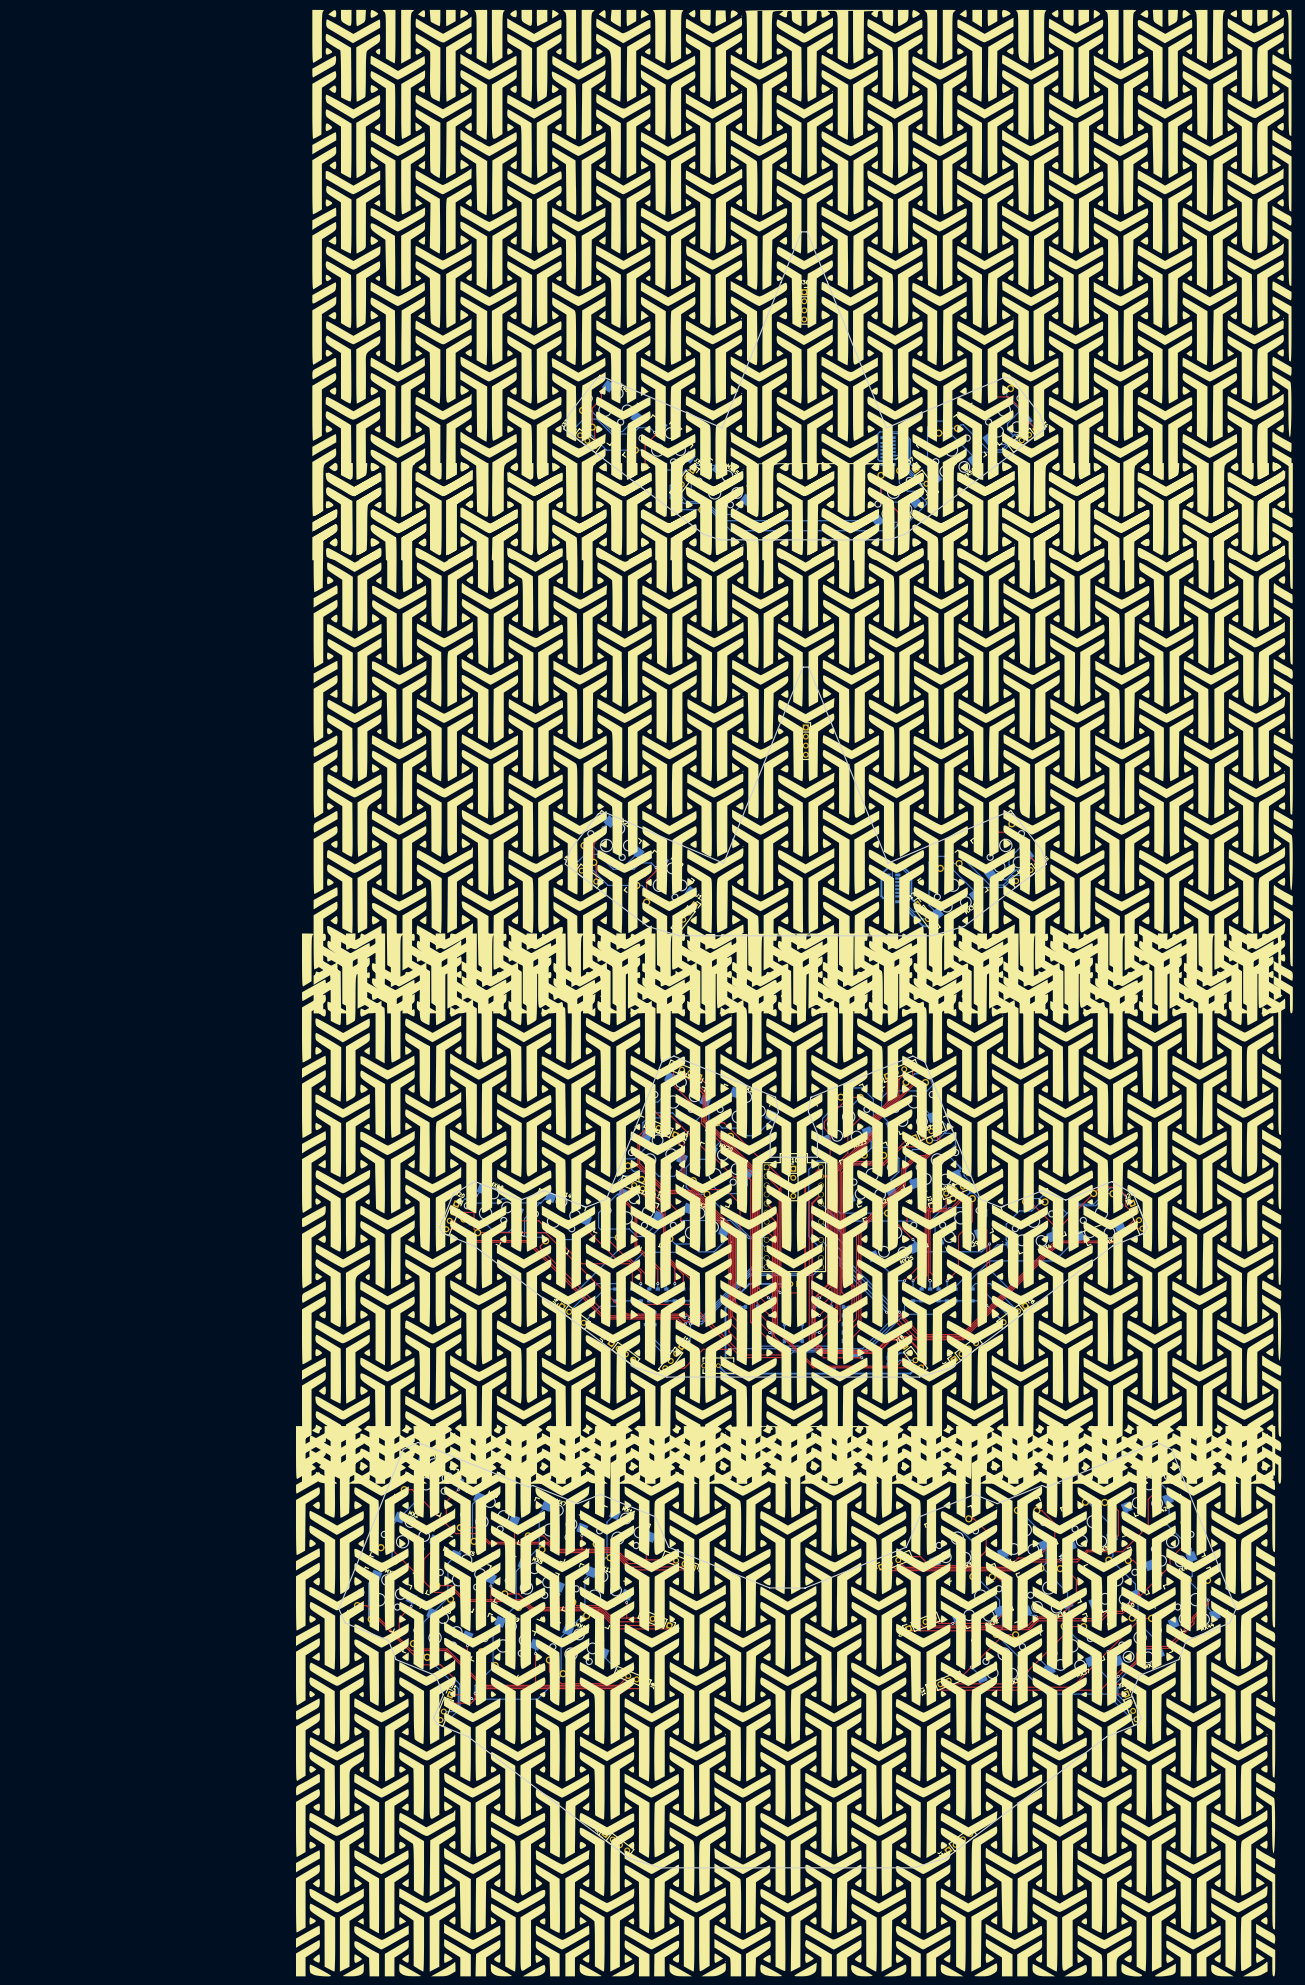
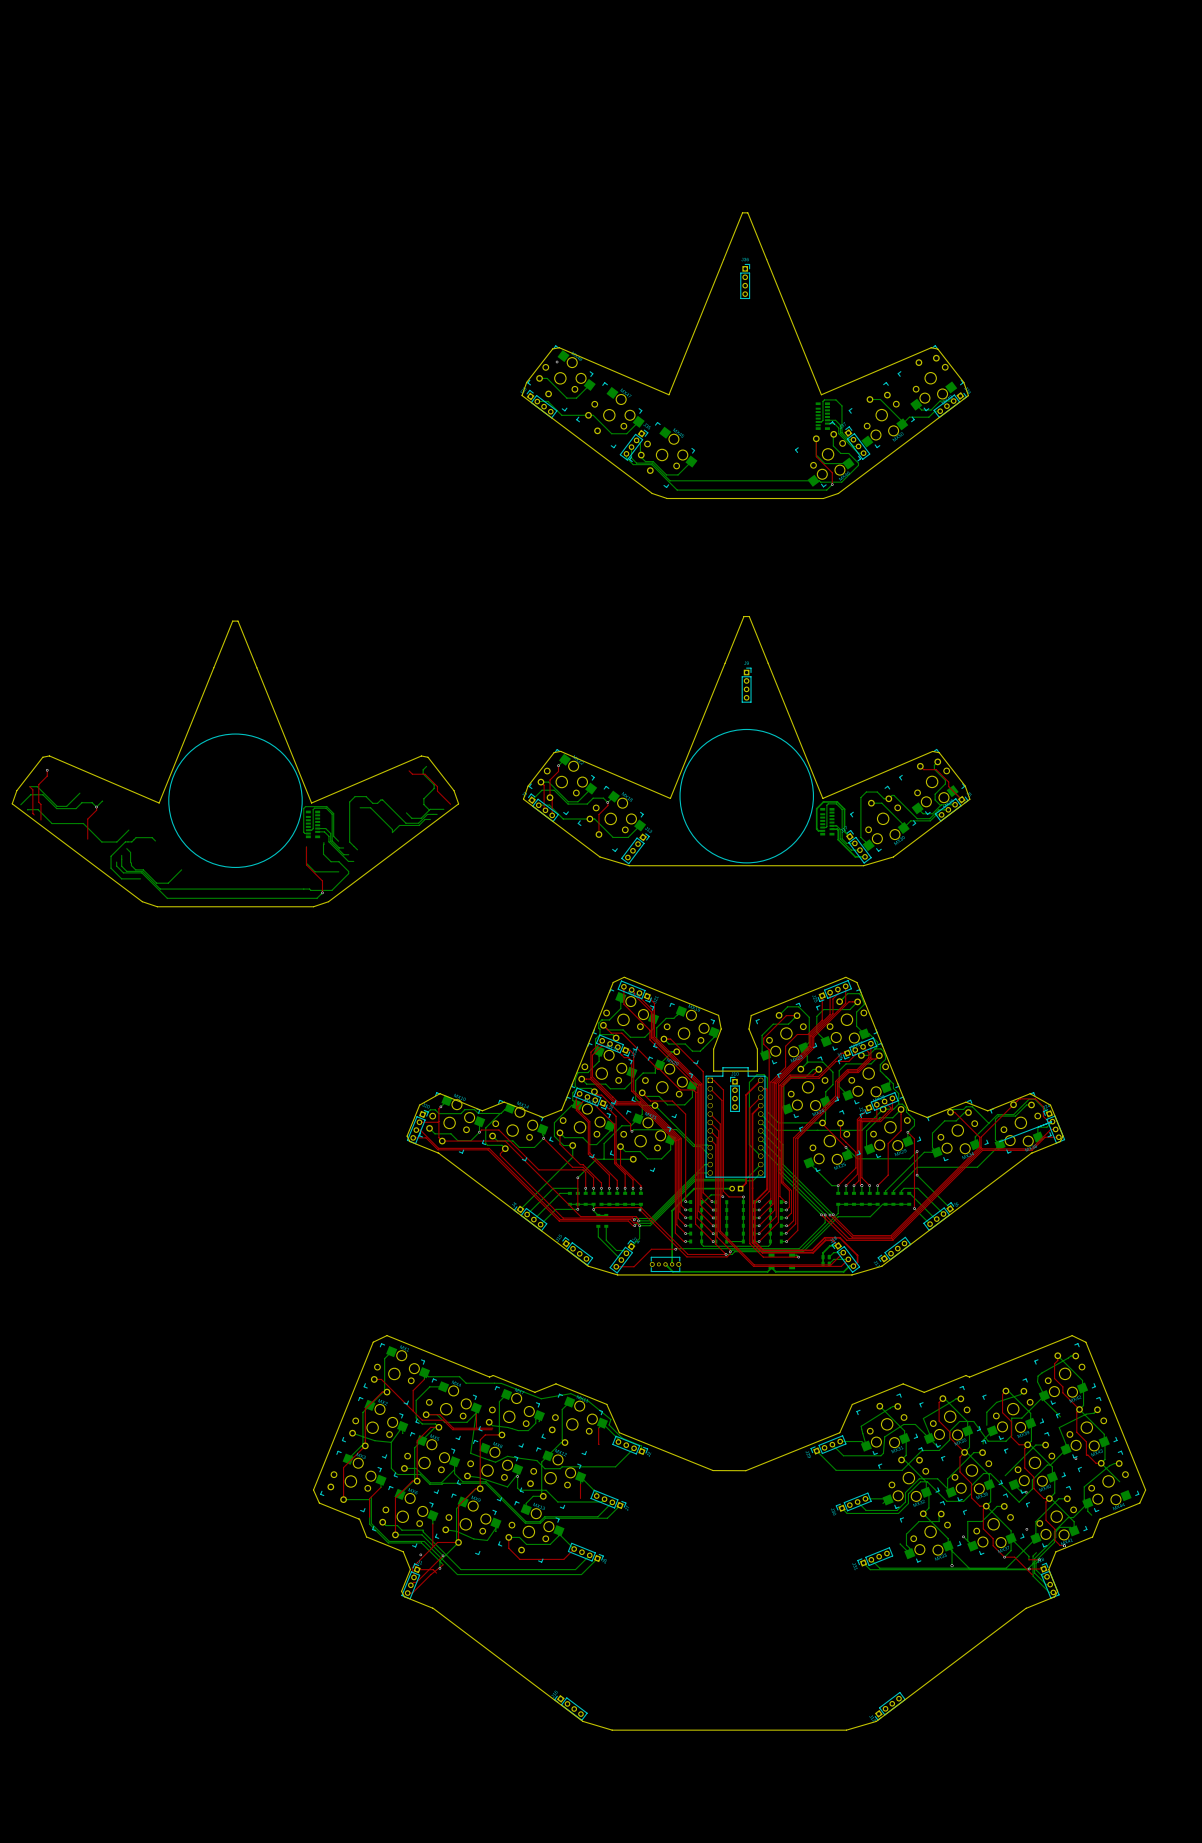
drawing: [295, 9, 1293, 1977] -> none
bottom track: (1010, 388) (1006, 392) (1006, 396) (1018, 408) (1018, 412) (1007, 423) (1007, 429) (1013, 435) -> none
top track: (601, 392) (601, 398) (592, 408) (594, 446) -> none
top track: (991, 393) (995, 396) (1008, 396) (1022, 410) (1022, 415) (1036, 429) -> none
bottom track: (661, 426) (654, 432) (649, 427) (638, 427) (632, 434) (611, 434) (596, 419) (583, 419) (572, 429) -> none
top track: (654, 432) (654, 435) (645, 445) (645, 466) -> none
via: (654, 432) -> none
bottom track: (1021, 440) (1011, 440) (1001, 449) (988, 449) (963, 424) (957, 428) (952, 428) (945, 421) (933, 421) (927, 426) (927, 469) (935, 478) -> none
bottom track: (882, 460) (877, 459) (877, 433) (879, 431) (902, 431) (910, 439) (910, 463) (915, 469) -> none
bottom track: (718, 468) (714, 465) (697, 465) (692, 469) (685, 469) (670, 485) (670, 498) (681, 509) (701, 509) -> none
board edge: none -> (232, 621) (159, 803) (49, 755) (42, 757) (16, 790) (12, 803) (142, 901) (157, 906) (313, 906) (328, 901) (458, 803) (454, 790) (428, 757) (421, 756) (311, 803) (238, 621) (232, 621)
drawing: none -> [679, 729, 814, 864]
drawing: none -> [168, 733, 303, 868]
bottom track: none -> (426, 766) (423, 769) (423, 773) (434, 784) (434, 788) (423, 798) (423, 804) (429, 810)
top track: none -> (47, 770) (47, 776) (38, 784) (40, 819)
via: none -> (47, 770)
top track: none -> (409, 770) (412, 774) (425, 774) (450, 804)
top track: none -> (29, 786) (32, 789) (34, 814)
bottom track: none -> (29, 786) (37, 786) (57, 806) (66, 806) (79, 793)
bottom track: none -> (102, 801) (96, 807) (92, 802) (81, 802) (76, 808) (56, 808) (42, 794) (30, 794) (20, 804)
top track: none -> (96, 807) (96, 810) (87, 819) (87, 839)
via: none -> (96, 807)
bottom track: none -> (360, 807) (370, 807) (392, 829) (392, 832) (399, 825) (419, 825) (425, 819) (430, 819)
bottom track: none -> (443, 809) (430, 809) (421, 818) (411, 818) (406, 812)
bottom track: none -> (27, 809) (38, 809) (52, 823) (83, 823) (101, 842) (116, 842) (128, 830)
bottom track: none -> (437, 814) (427, 814) (418, 823) (405, 823) (382, 799) (377, 803) (372, 803) (366, 796) (355, 796) (349, 802) (349, 841) (357, 849)
part: none -> (313, 824)
bottom track: none -> (317, 828) (325, 828) (330, 833) (330, 841) (343, 854)
bottom track: none -> (308, 830) (313, 828) (313, 809) (326, 808) (332, 814) (332, 840) (339, 847) (343, 847)
bottom track: none -> (317, 831) (324, 831) (328, 836) (328, 841) (348, 861) (353, 861)
bottom track: none -> (308, 833) (303, 832) (303, 808) (305, 806) (326, 806) (333, 813) (333, 836) (338, 841)
bottom track: none -> (155, 840) (152, 837) (136, 837) (131, 841) (125, 841) (111, 856) (111, 868) (121, 878) (140, 878)
bottom track: none -> (323, 842) (323, 854) (331, 861) (338, 861) (348, 871) (331, 890) (160, 889) (142, 871) (126, 871) (121, 866) (121, 855)
top track: none -> (306, 847) (306, 865) (322, 881) (322, 892)
bottom track: none -> (306, 847) (306, 863) (314, 871) (338, 871)
bottom track: none -> (126, 848) (130, 852) (131, 865) (135, 869) (143, 869) (156, 883) (168, 883) (181, 869)
bottom track: none -> (343, 854) (348, 854)
bottom track: none -> (116, 862) (116, 866) (123, 872) (141, 872) (167, 898) (316, 898) (322, 892)
via: none -> (322, 892)
top track: none -> (1057, 1355) (1057, 1360) (1054, 1363) (1054, 1378) (1062, 1386) (1062, 1392) (1079, 1409) (1076, 1412) (1076, 1432) (1086, 1441) (1086, 1455) (1096, 1463) (1101, 1463)
top track: (1160, 1464) (1160, 1486) (1148, 1499) (1148, 1526) (1122, 1551) (1087, 1551) (1077, 1561) (1023, 1561) (1014, 1570) (885, 1570) (881, 1566) -> none
bottom track: none -> (1075, 1355) (1071, 1355) (1038, 1376) (1037, 1381) (1044, 1395) (1021, 1418) (1011, 1418) (1011, 1435) (1006, 1441) (988, 1441) (973, 1421) (959, 1421) (949, 1431) (949, 1439) (939, 1450) (921, 1450) (902, 1470) (836, 1470) (816, 1450)
bottom track: none -> (424, 1372) (428, 1376) (459, 1376) (466, 1383) (501, 1383) (541, 1398) (570, 1393) (588, 1401) (610, 1419) (609, 1424) (622, 1438) (641, 1446) (641, 1451)
via: (458, 1489) -> none
bottom track: (479, 1497) (472, 1504) (472, 1539) -> (443, 1386) (429, 1386) (416, 1400) (416, 1418) (422, 1423) (435, 1423) (437, 1425)
top track: none -> (1005, 1391) (1002, 1394) (1002, 1412) (1011, 1421) (1011, 1437) (1019, 1444) (1027, 1444) (1024, 1448) (1024, 1468) (1033, 1477) (1033, 1488) (1043, 1498) (1049, 1498) (1045, 1501) (1045, 1520) (1055, 1529) (1055, 1540) (1060, 1545) (1064, 1545)
top track: (1104, 1502) (1109, 1502) (1118, 1510) (1118, 1535) (1103, 1550) (1086, 1550) (1077, 1559) (1023, 1559) (1014, 1569) (895, 1569) (889, 1563) -> none
bottom track: none -> (1023, 1391) (1020, 1394) (996, 1402) (986, 1412) (986, 1425)
top track: none -> (942, 1398) (939, 1402) (939, 1421) (950, 1432) (950, 1437) (964, 1452) (959, 1456) (959, 1472) (971, 1483) (971, 1497) (979, 1506) (986, 1506) (983, 1509) (983, 1528) (993, 1538) (993, 1545) (1004, 1557) (1014, 1557) (1032, 1574)
top track: (1036, 1510) (1041, 1510) (1054, 1523) (1054, 1540) (1037, 1557) (1018, 1557) (1008, 1567) (905, 1567) (898, 1560) -> none
bottom track: none -> (960, 1398) (956, 1398) (923, 1418) (929, 1433)
top track: (968, 1518) (973, 1518) (986, 1531) (986, 1550) (971, 1565) (929, 1565) (920, 1556) (906, 1556) -> none
bottom track: none -> (897, 1406) (893, 1406) (861, 1426) (866, 1446) (861, 1441) (840, 1441)
top track: (1184, 1522) (1184, 1544) (1170, 1559) (1170, 1565) (1122, 1613) (1108, 1613) (1101, 1620) (1038, 1620) (1029, 1629) (910, 1630) (908, 1628) -> none
bottom track: none -> (1097, 1409) (1094, 1413) (1086, 1414) (1059, 1427) (1066, 1444)
bottom track: none -> (426, 1414) (437, 1414) (444, 1422) (466, 1422) (476, 1412) (470, 1453) (495, 1462) (507, 1456) (536, 1460) (544, 1468) (615, 1466) (634, 1448)
bottom track: none -> (539, 1415) (535, 1419) (535, 1423) (528, 1430) (492, 1425) (489, 1422)
top track: (528, 1535) (543, 1535) (557, 1549) (614, 1549) (628, 1563) (673, 1563) (676, 1560) -> none
top track: (581, 1535) (581, 1549) -> none
via: (581, 1535) -> none
bottom track: none -> (602, 1423) (618, 1439) (618, 1441)
top track: none -> (438, 1427) (430, 1427) (417, 1440) (417, 1481) (412, 1481) (395, 1498) (395, 1534)
top track: (532, 1542) (547, 1542) (556, 1550) (613, 1550) (629, 1566) (681, 1566) (684, 1563) -> none
top track: (531, 1543) (547, 1543) (555, 1552) (612, 1552) (630, 1569) (690, 1569) (692, 1567) -> none
bottom track: none -> (399, 1430) (402, 1426) (391, 1442)
top track: (596, 1544) (599, 1547) (614, 1547) (627, 1559) (664, 1559) (667, 1557) -> none
top track: (380, 1547) (390, 1547) (434, 1592) (455, 1592) (464, 1601) (521, 1601) (530, 1610) (598, 1610) (616, 1628) (667, 1628) (669, 1625) -> none
bottom track: none -> (352, 1433) (374, 1440) (391, 1442)
top track: (435, 1547) (423, 1559) (423, 1581) -> none
bottom track: none -> (929, 1433) (929, 1438) (915, 1424) (903, 1424) (884, 1436) (883, 1453) (880, 1455) (843, 1455) (832, 1444)
bottom track: (536, 1549) (516, 1571) (516, 1605) (518, 1607) -> none
bottom track: none -> (391, 1442) (391, 1468) (397, 1474) (420, 1474) (429, 1484) (485, 1483) (525, 1523) (540, 1523) (545, 1518) (607, 1518) (620, 1505)
via: (1060, 1559) -> none
bottom track: none -> (1066, 1444) (1066, 1449) (1032, 1479) (1032, 1488) (1019, 1502) (990, 1473) (983, 1473) (971, 1485) (971, 1493) (963, 1501) (946, 1501) (927, 1481) (920, 1481) (908, 1493) (908, 1503) (898, 1513) (847, 1513) (842, 1508)
top track: (1128, 1560) (1133, 1560) (1139, 1566) (1139, 1594) (1122, 1611) (1107, 1611) (1099, 1618) (1037, 1618) (1028, 1627) (923, 1627) (921, 1625) (917, 1625) -> none
bottom track: none -> (1045, 1445) (1035, 1445) (1005, 1475)
top track: (1060, 1568) (1065, 1568) (1076, 1579) (1076, 1599) (1059, 1617) (1036, 1617) (1027, 1626) (929, 1626) (925, 1621) -> none
bottom track: none -> (982, 1452) (973, 1452) (947, 1478) (947, 1488)
bottom track: (376, 1575) (368, 1583) (368, 1616) (371, 1619) -> (443, 1564) (421, 1542) (388, 1542) (369, 1524) (369, 1499) (343, 1499)
top track: (992, 1576) (997, 1576) (1006, 1585) (1006, 1610) (993, 1623) (938, 1623) (933, 1618) -> none
top track: (1207, 1580) (1203, 1583) (1203, 1605) (1192, 1617) (1192, 1621) (1167, 1646) (1143, 1646) (1136, 1653) (1136, 1660) (1126, 1669) (1120, 1669) (1100, 1690) (934, 1690) (931, 1687) -> none
bottom track: none -> (1119, 1463) (1109, 1465) (1084, 1486) (1084, 1499) (1087, 1503) (1073, 1517) (1068, 1517) (1054, 1531) (1054, 1542) (1027, 1569) (870, 1569) (863, 1562)
top track: (436, 1585) (451, 1585) (465, 1599) (522, 1599) (531, 1609) (598, 1609) (615, 1625) (657, 1625) (661, 1622) -> none
bottom track: none -> (404, 1468) (416, 1468) (430, 1482) (441, 1482) (454, 1469)
top track: (490, 1586) (490, 1599) -> none
bottom track: none -> (454, 1468) (454, 1473) (462, 1481) (486, 1481) (526, 1521) (539, 1521) (544, 1516) (597, 1516) (612, 1502)
via: (490, 1586) -> none
bottom track: none -> (517, 1474) (507, 1486) (478, 1477) (467, 1476)
top track: (504, 1593) (518, 1593) (532, 1607) (599, 1607) (613, 1621) (649, 1621) (652, 1618) -> none
bottom track: none -> (517, 1476) (517, 1488) (519, 1490) (546, 1490) (557, 1501) (601, 1501) (604, 1499)
bottom track: none -> (580, 1476) (596, 1493) (596, 1496)
top track: (1208, 1600) (1208, 1603) (1193, 1618) (1193, 1623) (1169, 1648) (1144, 1648) (1138, 1654) (1138, 1660) (1127, 1671) (1122, 1671) (1118, 1676) -> none
bottom track: (1208, 1600) (1208, 1608) (1214, 1614) -> none
via: (1208, 1600) -> none
top track: (572, 1602) (576, 1605) (600, 1605) (612, 1618) (641, 1618) (644, 1615) -> none
via: (626, 1602) -> none
top track: (357, 1605) (366, 1605) (411, 1650) (446, 1650) (484, 1688) (639, 1688) (645, 1682) -> none
via: (411, 1606) -> none
bottom track: (1026, 1611) (1030, 1615) (1036, 1616) -> (951, 1492) (937, 1478) (919, 1478) (905, 1492) (905, 1502) (897, 1510) (866, 1510) (857, 1501)
bottom track: (432, 1613) (423, 1622) (423, 1653) (458, 1688) (458, 1706) (453, 1711) (443, 1711) -> none
bottom track: (582, 1615) (561, 1637) (561, 1671) (563, 1673) (537, 1699) (471, 1698) -> (539, 1496) (533, 1496) (526, 1503) (526, 1509)
bottom track: none -> (371, 1496) (371, 1523) (389, 1541) (424, 1541) (457, 1574) (581, 1574) (597, 1558)
via: (1036, 1616) -> none
bottom track: none -> (865, 1498) (887, 1498)
top track: (1151, 1618) (1140, 1618) (1072, 1687) (943, 1687) (940, 1684) -> none
bottom track: none -> (1067, 1498) (1058, 1498) (1035, 1521) (1035, 1533)
top track: (371, 1619) (378, 1619) (423, 1664) (440, 1664) (454, 1678) -> (343, 1499) (343, 1467) (365, 1445) (365, 1409) (382, 1392) (387, 1392)
via: (952, 1623) -> none
top track: (1083, 1626) (1072, 1626) (1015, 1683) (951, 1683) (948, 1680) -> none
bottom track: none -> (1004, 1506) (997, 1506) (982, 1521) (967, 1521) (967, 1540)
top track: (1015, 1634) (1003, 1634) (961, 1677) (957, 1677) -> none
bottom track: none -> (941, 1513) (939, 1513) (939, 1521) (919, 1521) (906, 1534) (906, 1544) (909, 1548) (909, 1553)
top track: (413, 1643) (418, 1648) (447, 1648) (485, 1686) (629, 1686) (636, 1679) -> none
bottom track: none -> (382, 1522) (386, 1525) (397, 1525) (401, 1530) (423, 1530) (460, 1569) (575, 1569) (589, 1555)
via: (467, 1645) -> none
bottom track: none -> (495, 1528) (487, 1540) (473, 1538) (456, 1531) (445, 1529)
top track: (481, 1651) (481, 1680) (486, 1685) (618, 1685) (628, 1675) -> none
top track: (535, 1653) (535, 1685) -> none
via: (535, 1653) -> none
bottom track: none -> (1035, 1533) (1035, 1538) (1006, 1568) (879, 1568) (871, 1559)
bottom track: none -> (558, 1533) (550, 1544) (526, 1544) (519, 1537) (508, 1537)
bottom track: none -> (395, 1534) (422, 1534) (443, 1555)
bottom track: none -> (1011, 1538) (1011, 1550) (1004, 1557)
via: (971, 1667) -> none
bottom track: none -> (948, 1546) (952, 1550) (952, 1565)
via: none -> (1064, 1545)
via: (1118, 1676) -> none
bottom track: (454, 1678) (459, 1684) (459, 1708) (448, 1720) (440, 1720) -> none
top track: none -> (443, 1555) (416, 1582) (410, 1585)
via: none -> (443, 1555)
via: none -> (1004, 1557)
top track: none -> (443, 1564) (412, 1593) (407, 1593)
via: none -> (952, 1565)
top track: (475, 1693) (475, 1699) (470, 1703) (447, 1703) -> (501, 1434) (485, 1434) (480, 1439) (480, 1488) (475, 1488) (458, 1505) (458, 1542) (437, 1542) (412, 1567) (413, 1577)
via: (471, 1698) -> none

